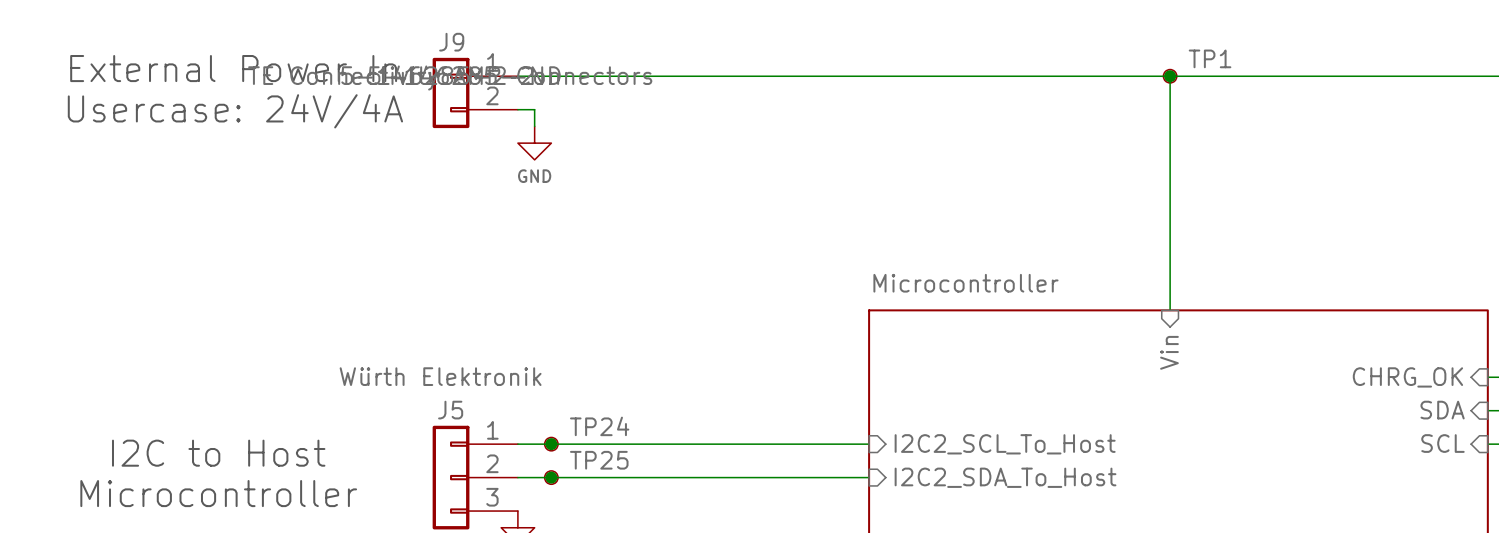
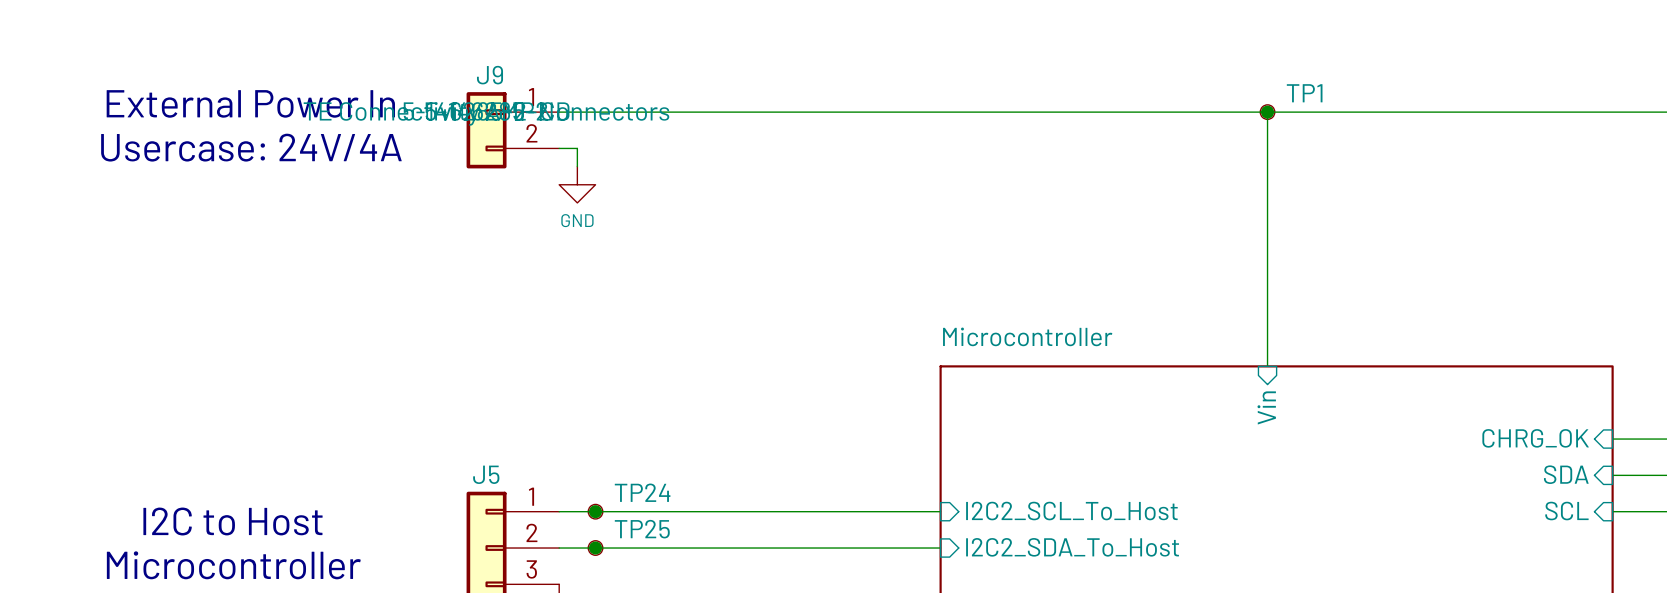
J5 text: Würth Elektronik (440, 376) -> none

